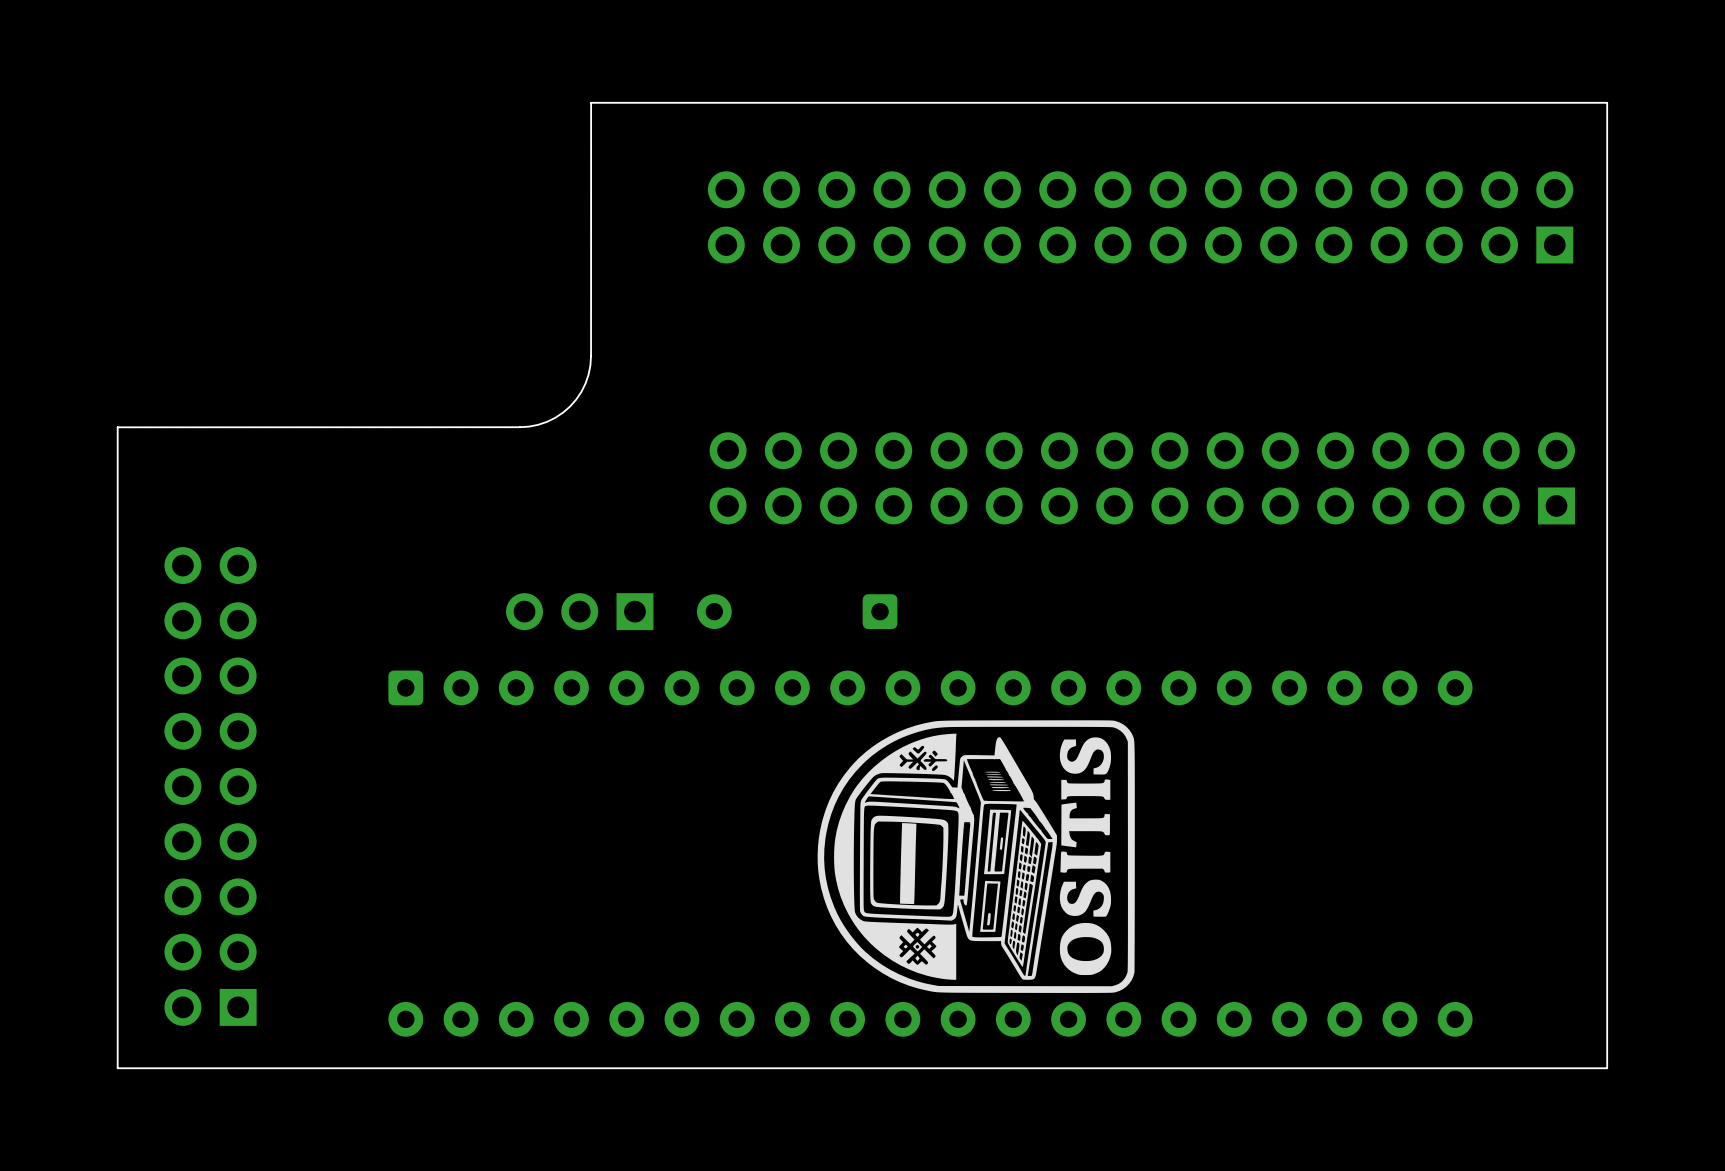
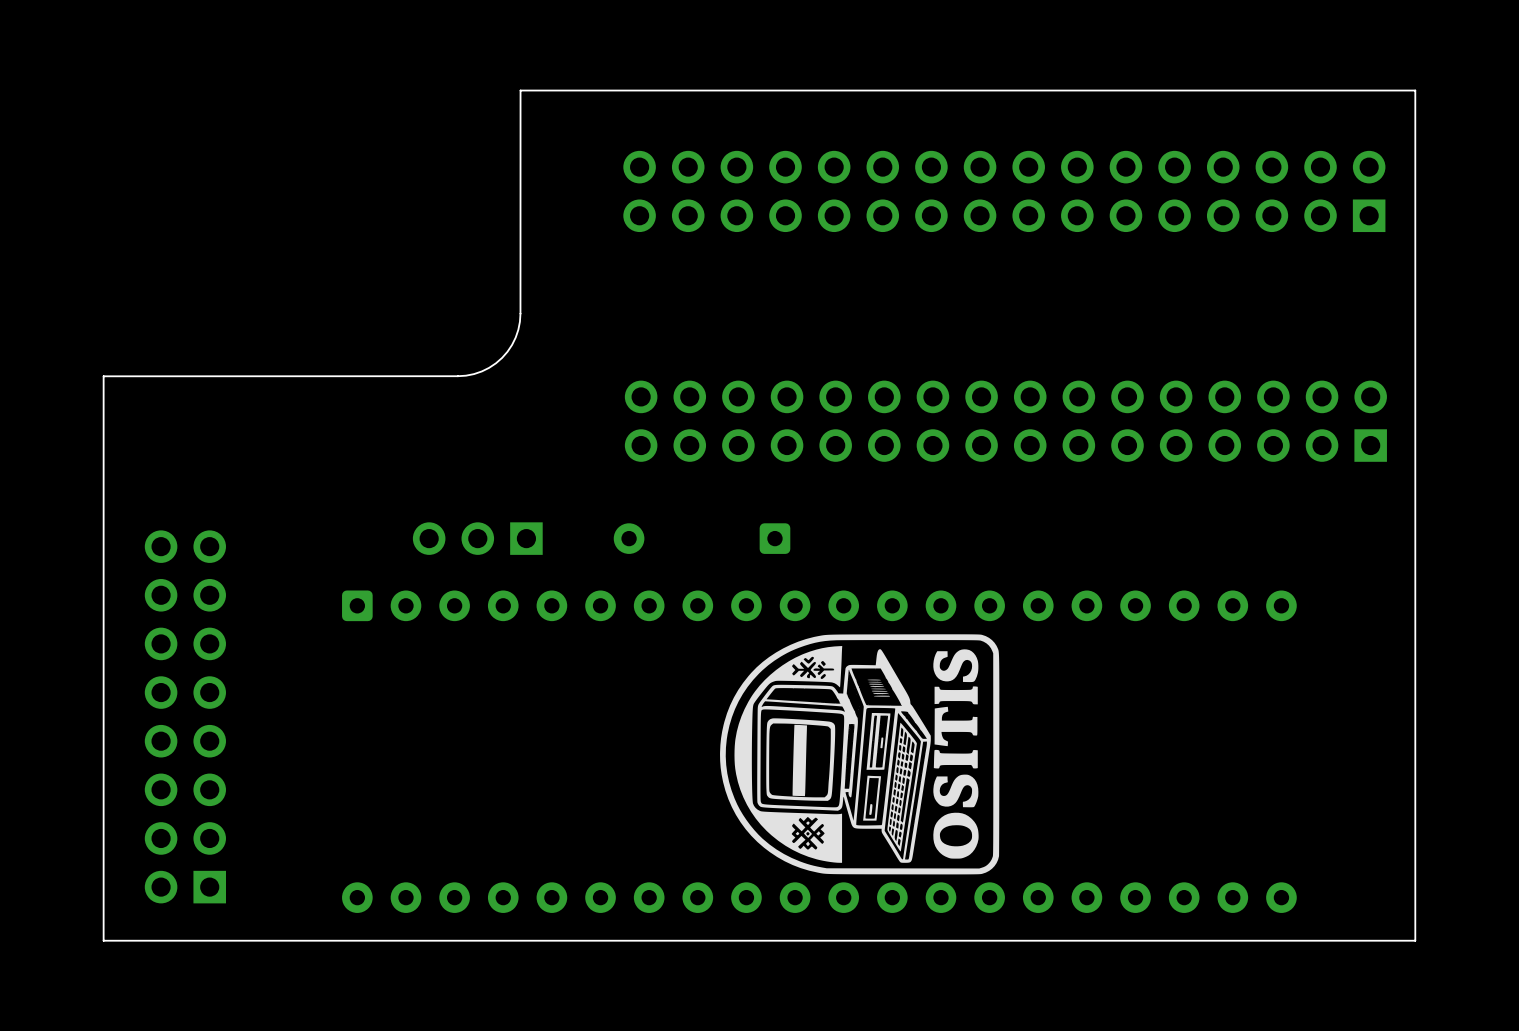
part position: (579, 611) -> (477, 538)
part: (210, 786) -> none

